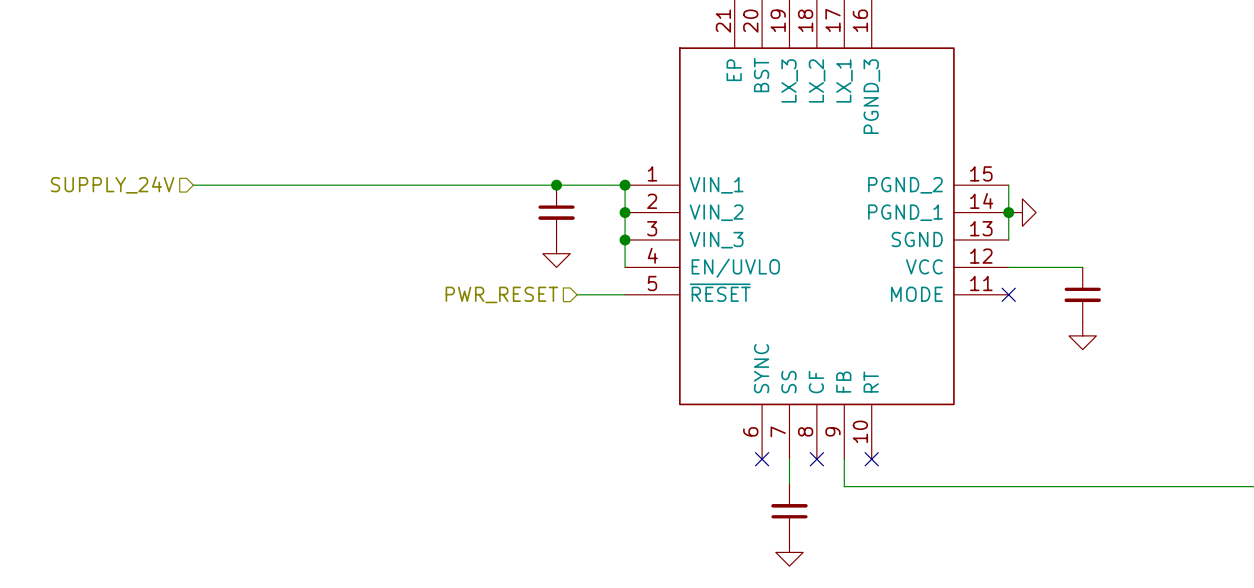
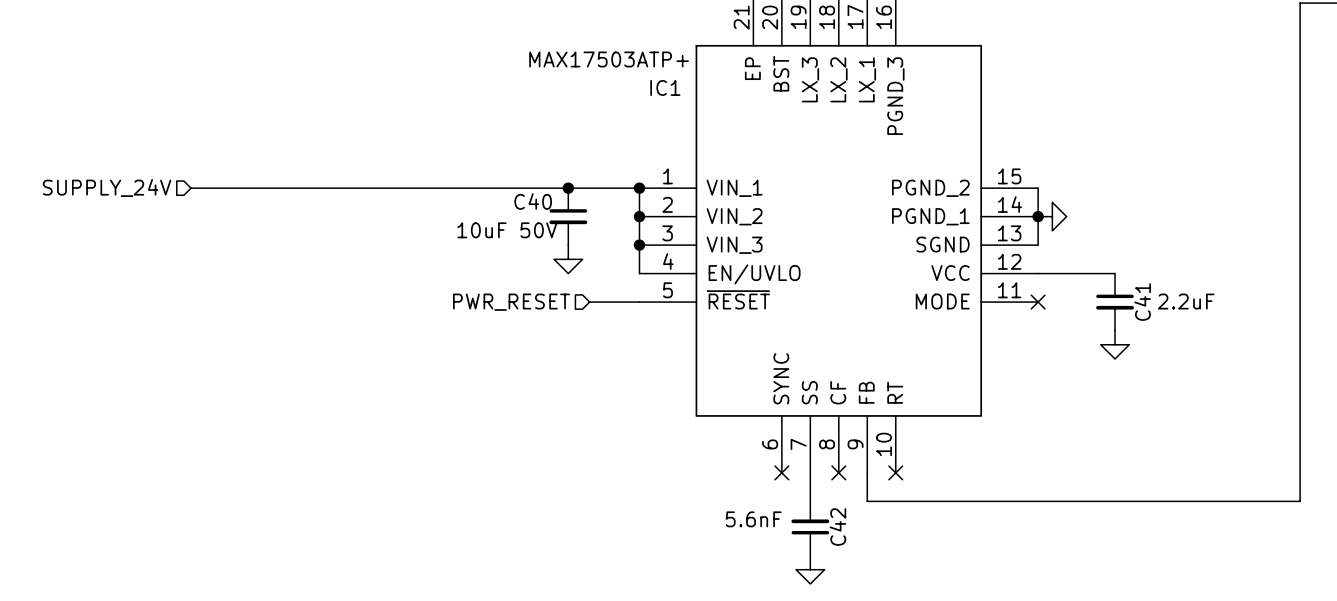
IC1 value: none -> MAX17503ATP+ (609, 59)
IC1 name: none -> IC1 (665, 87)
C40 name: none -> C40 (533, 201)
C40 value: none -> 10uF 50V (507, 230)
C41 name: none -> C41 (1142, 302)
C41 value: none -> 2.2uF (1186, 301)
C42 value: none -> 5.6nF (753, 519)
C42 name: none -> C42 (837, 527)

